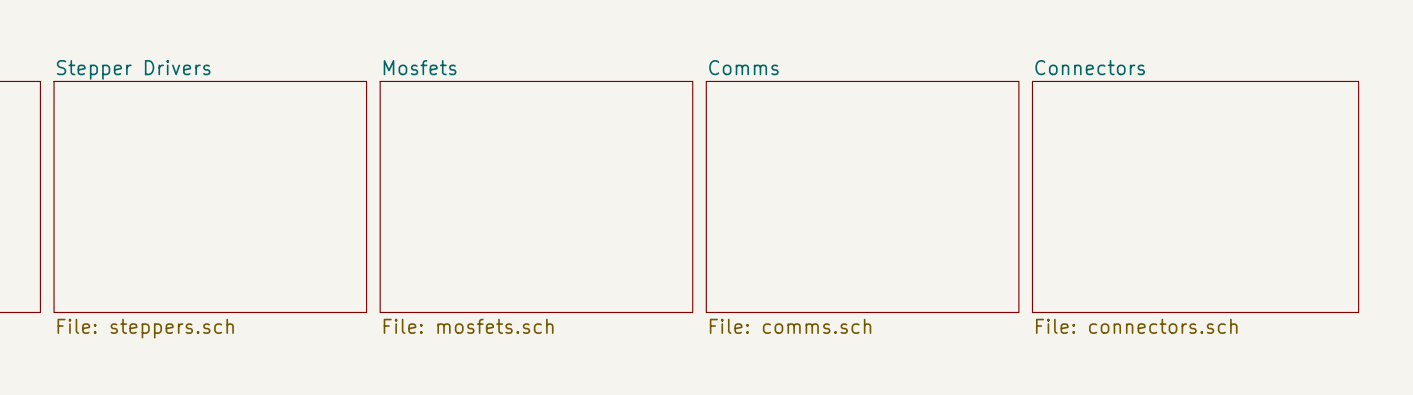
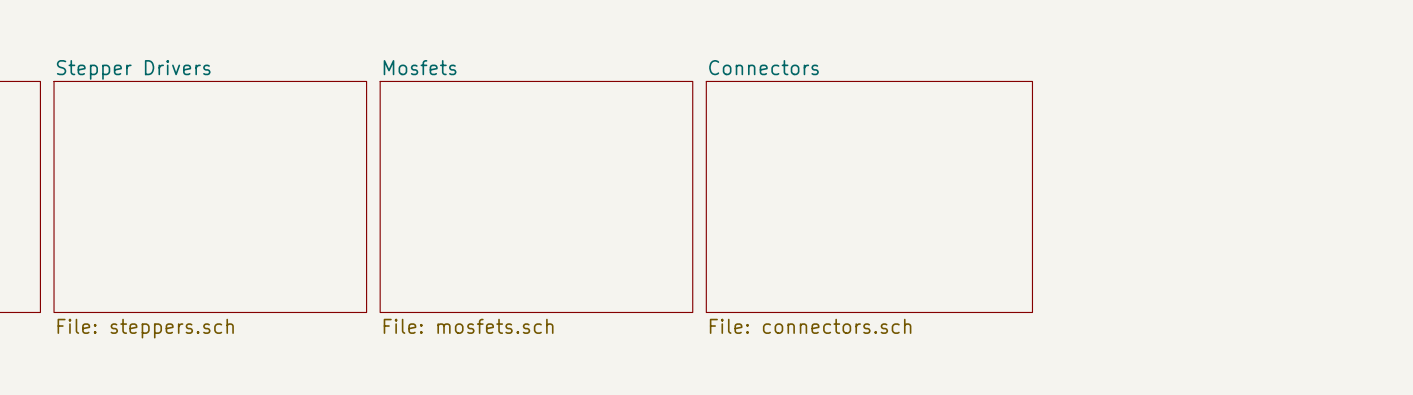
sheet Comms: File: comms.sch (862, 196) -> none
sheet Connectors: none -> File: connectors.sch (869, 196)
sheet Connectors: File: connectors.sch (1195, 196) -> none

